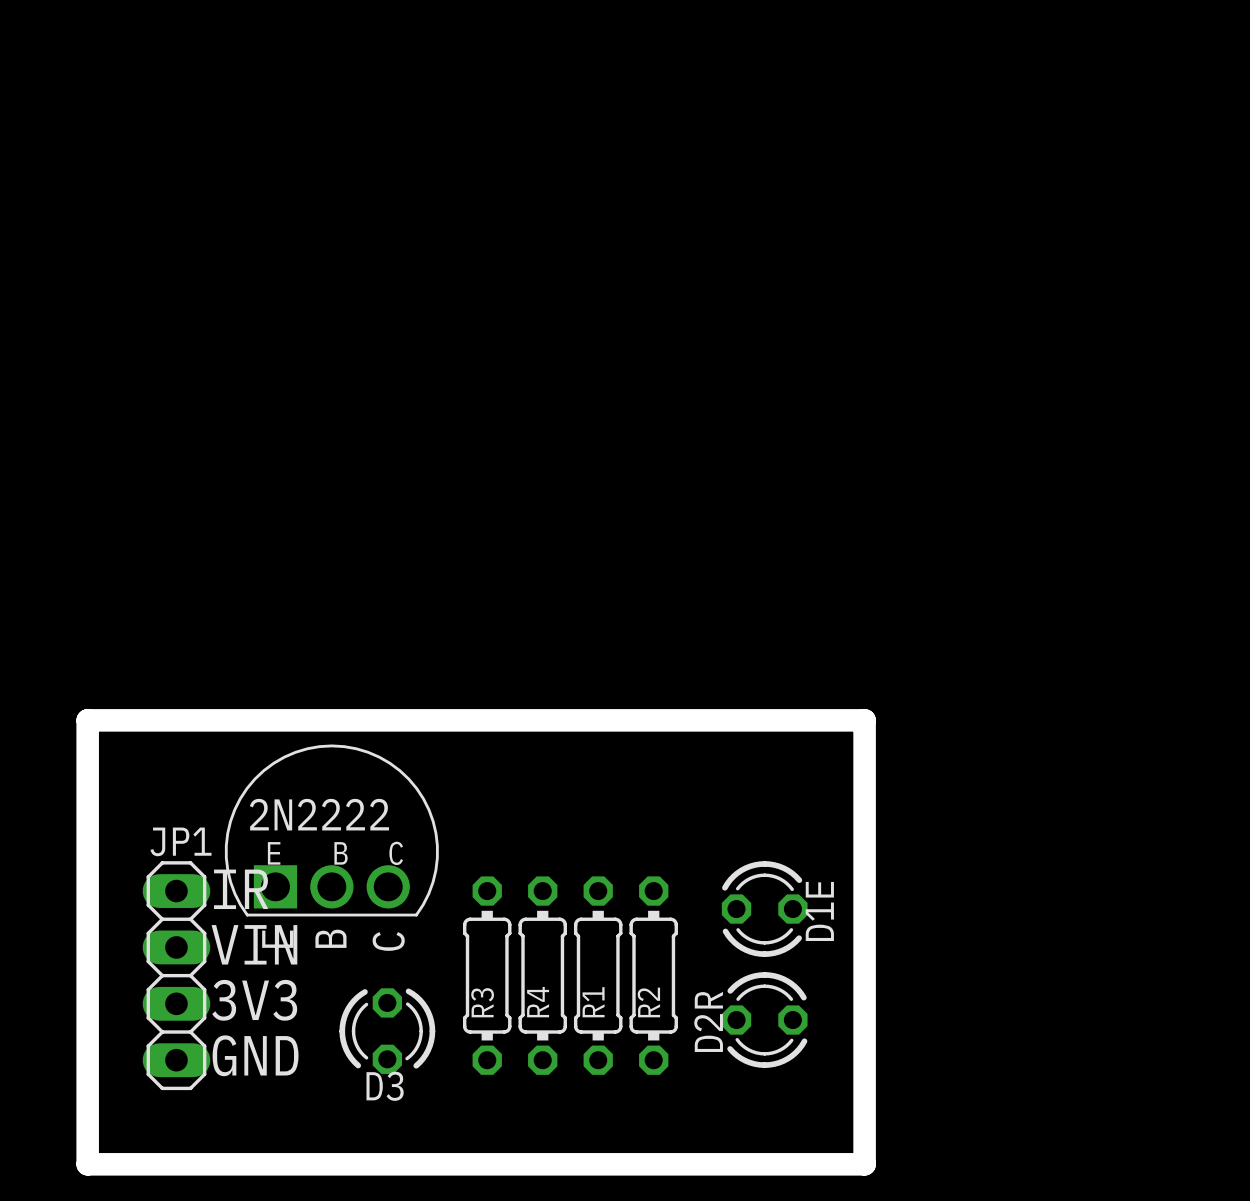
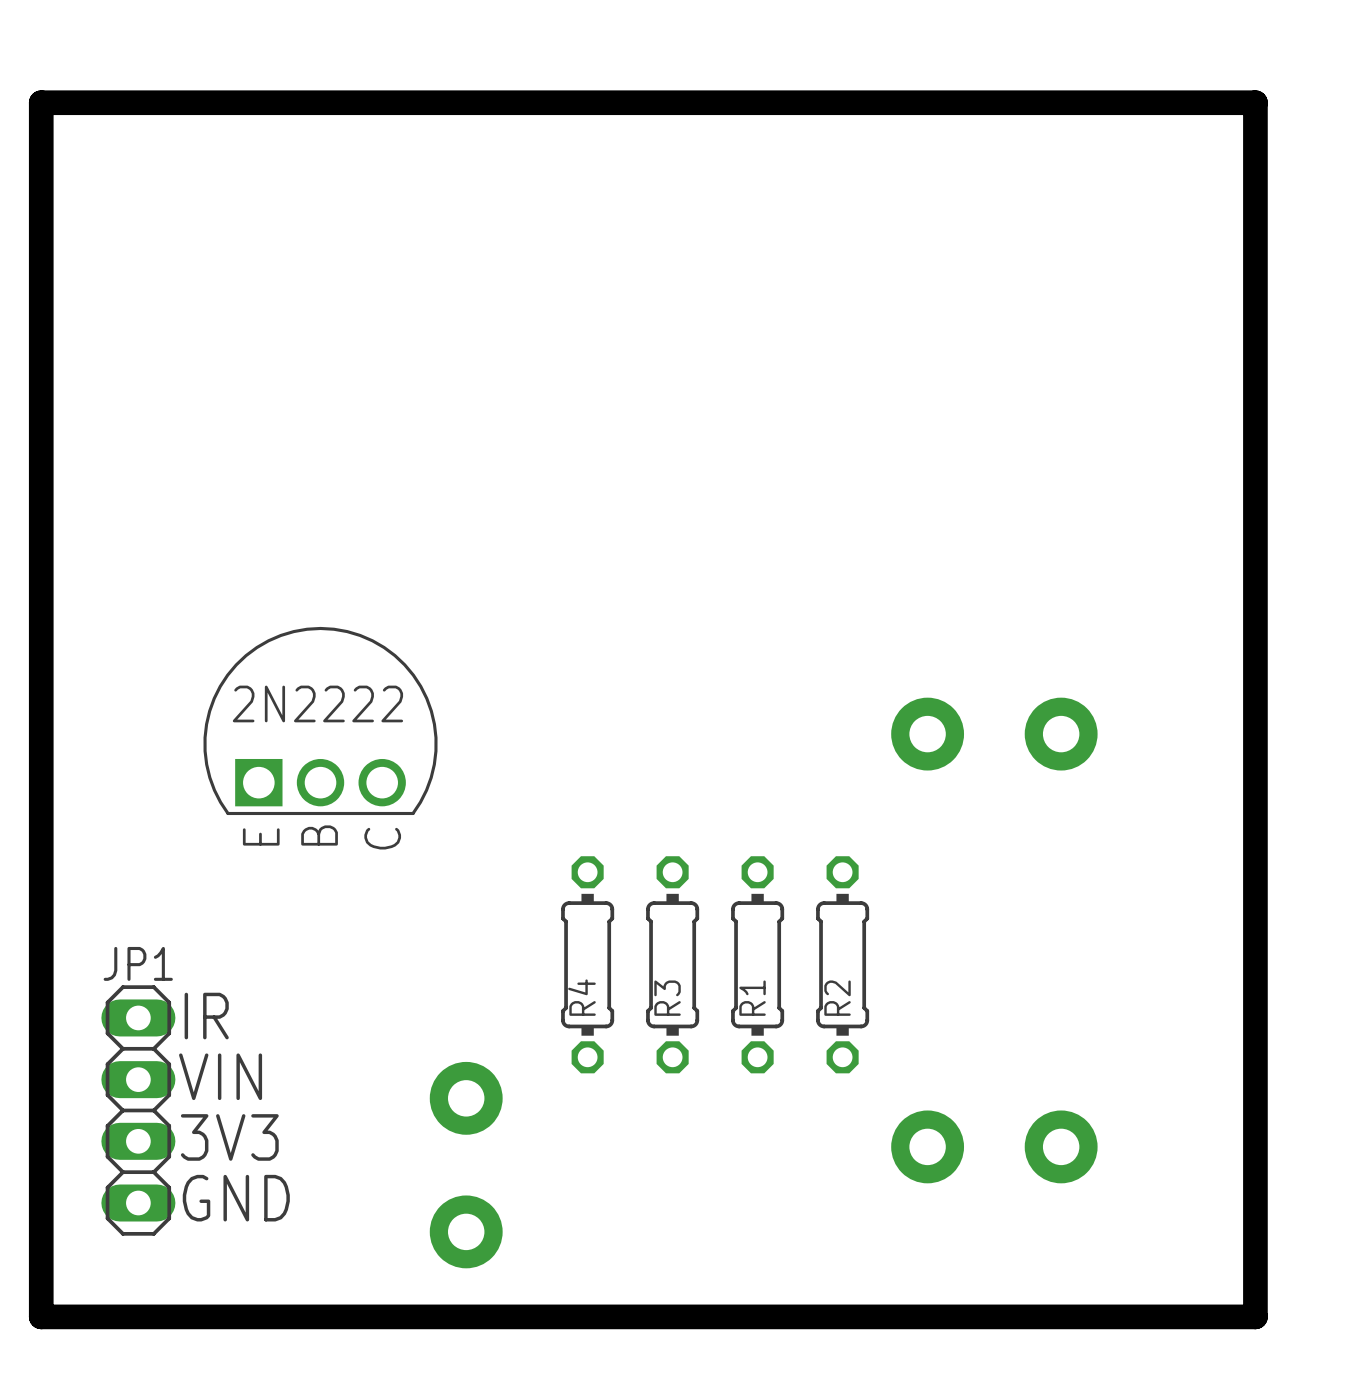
via: none -> (927, 734)
via: none -> (1061, 734)
board edge: (87, 720) (864, 720) (864, 1164) -> (41, 831) (41, 102) (1255, 102) (1255, 1316) (891, 1316)
part position: (331, 830) -> (320, 720)
text: E (274, 853) -> none
text: B (341, 853) -> none
text: C (396, 853) -> none
D1E: (764, 909) -> none
via: none -> (466, 1098)
R3 position: (487, 975) -> (672, 964)
R4 position: (542, 975) -> (587, 964)
R1 position: (598, 975) -> (757, 964)
R2 position: (653, 975) -> (842, 964)
via: none -> (927, 1146)
via: none -> (1061, 1146)
D2R: (764, 1020) -> none
D3: (387, 1031) -> none
via: none -> (466, 1231)

